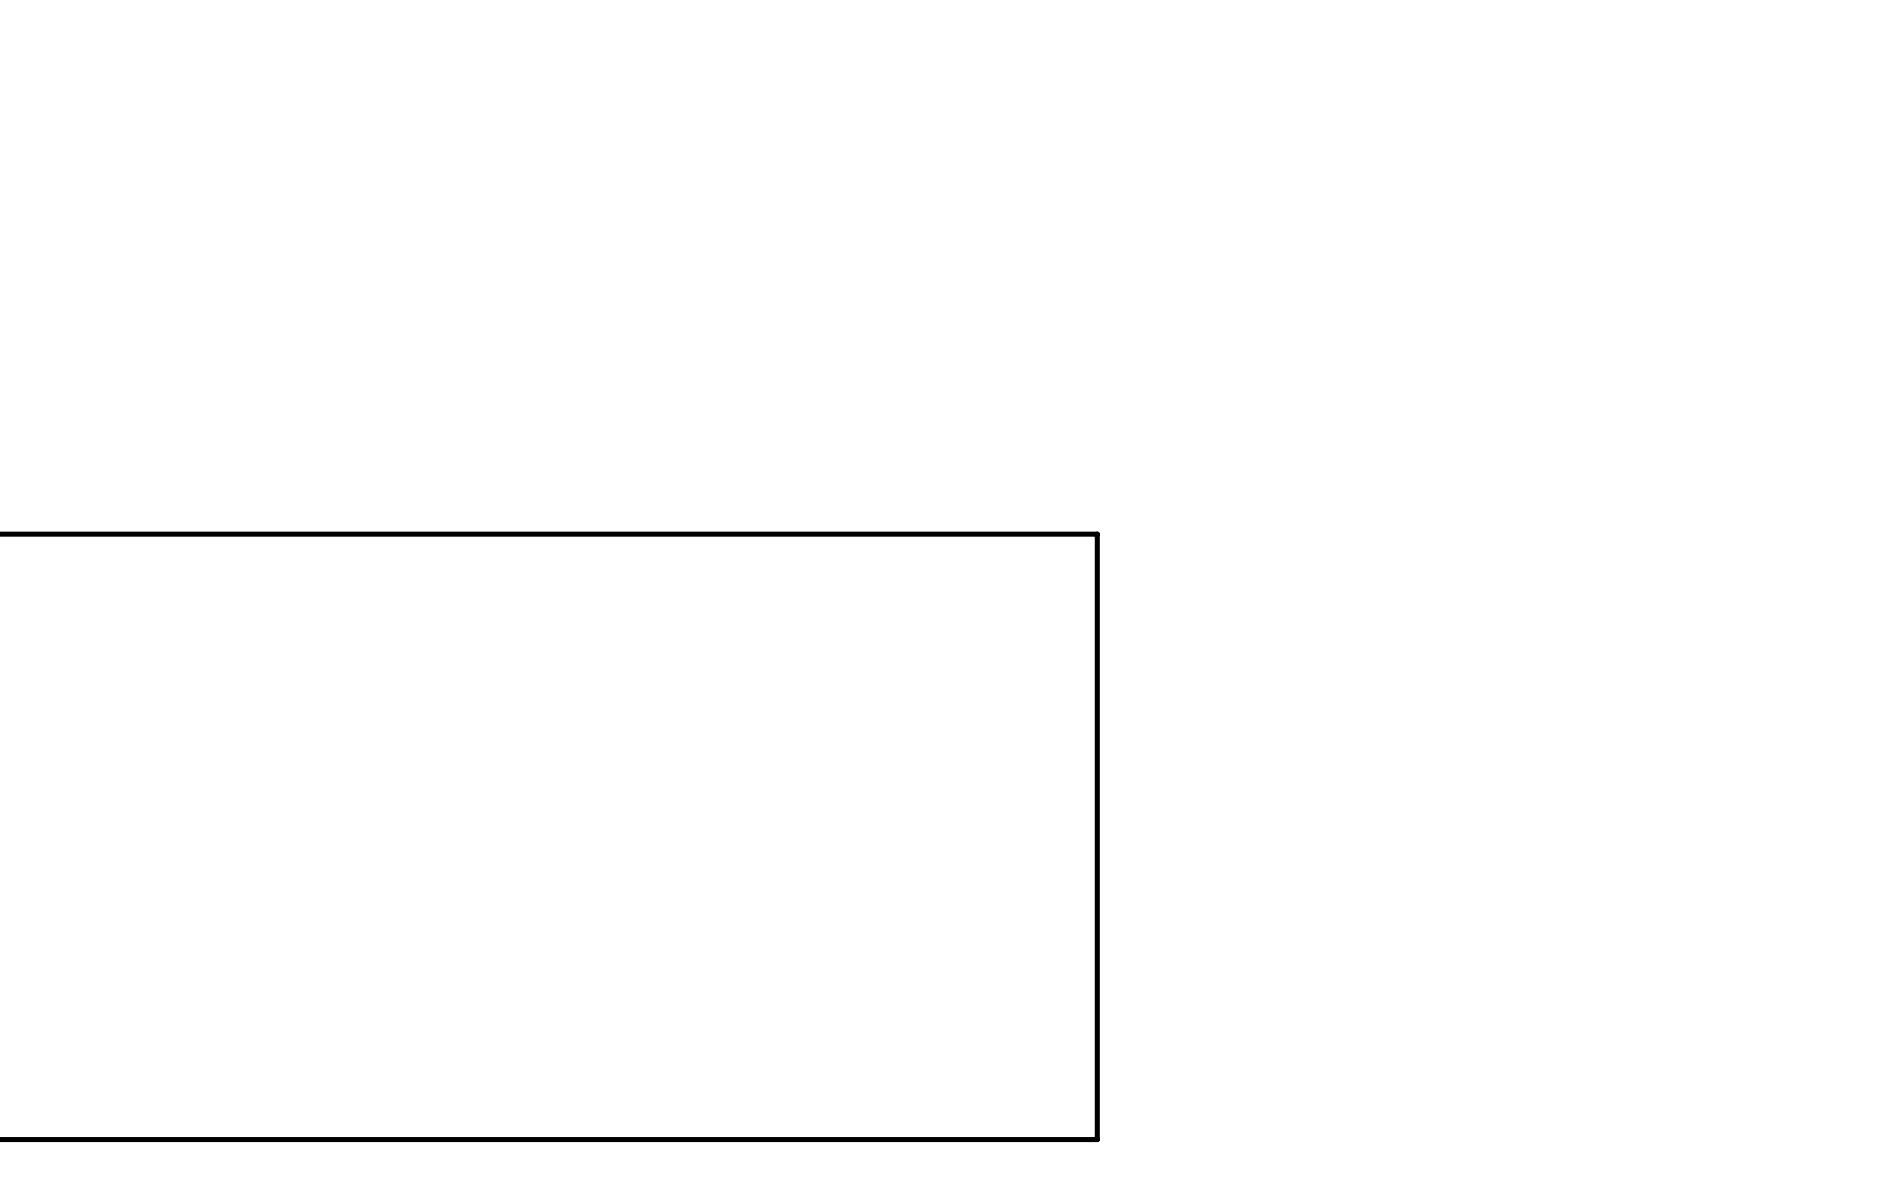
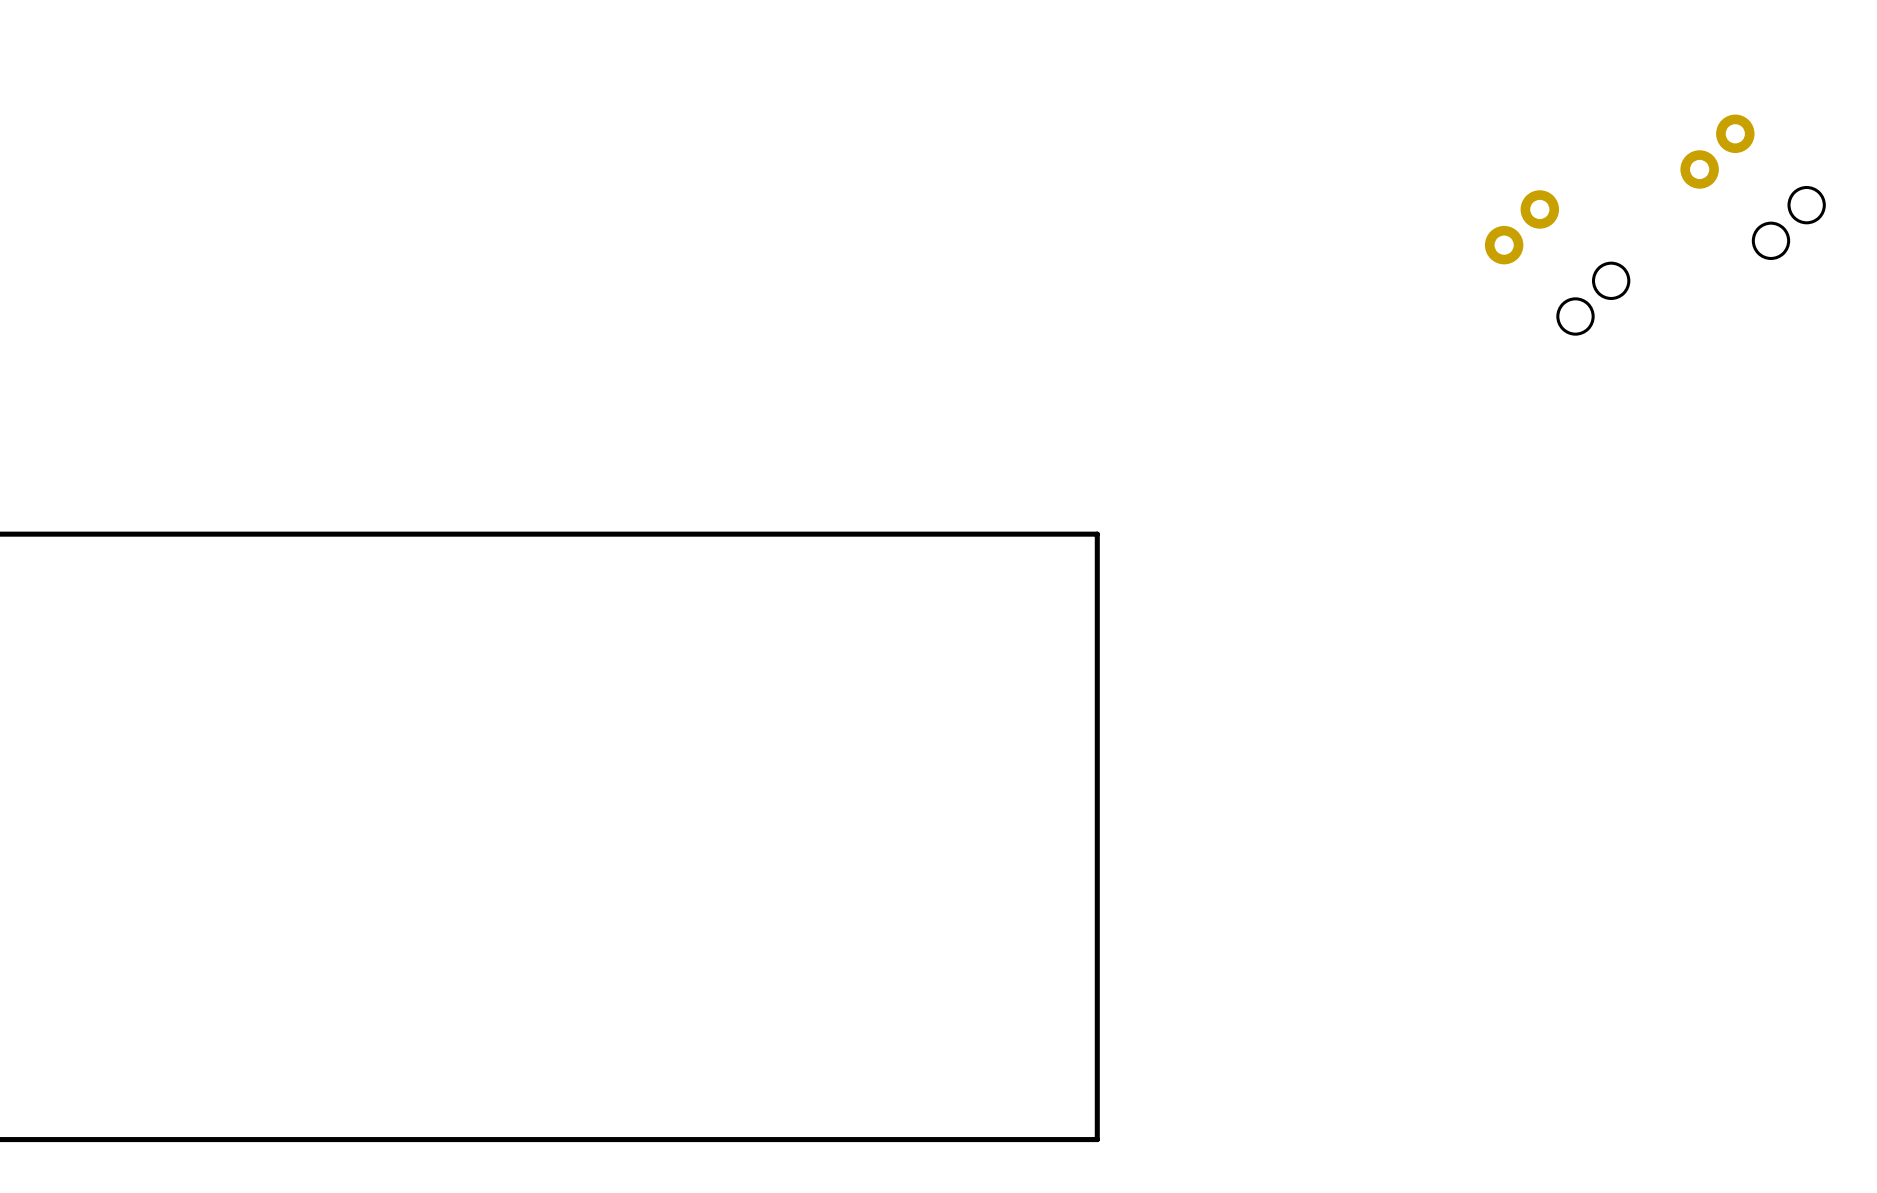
part: none -> (1753, 187)
part: none -> (1557, 262)

